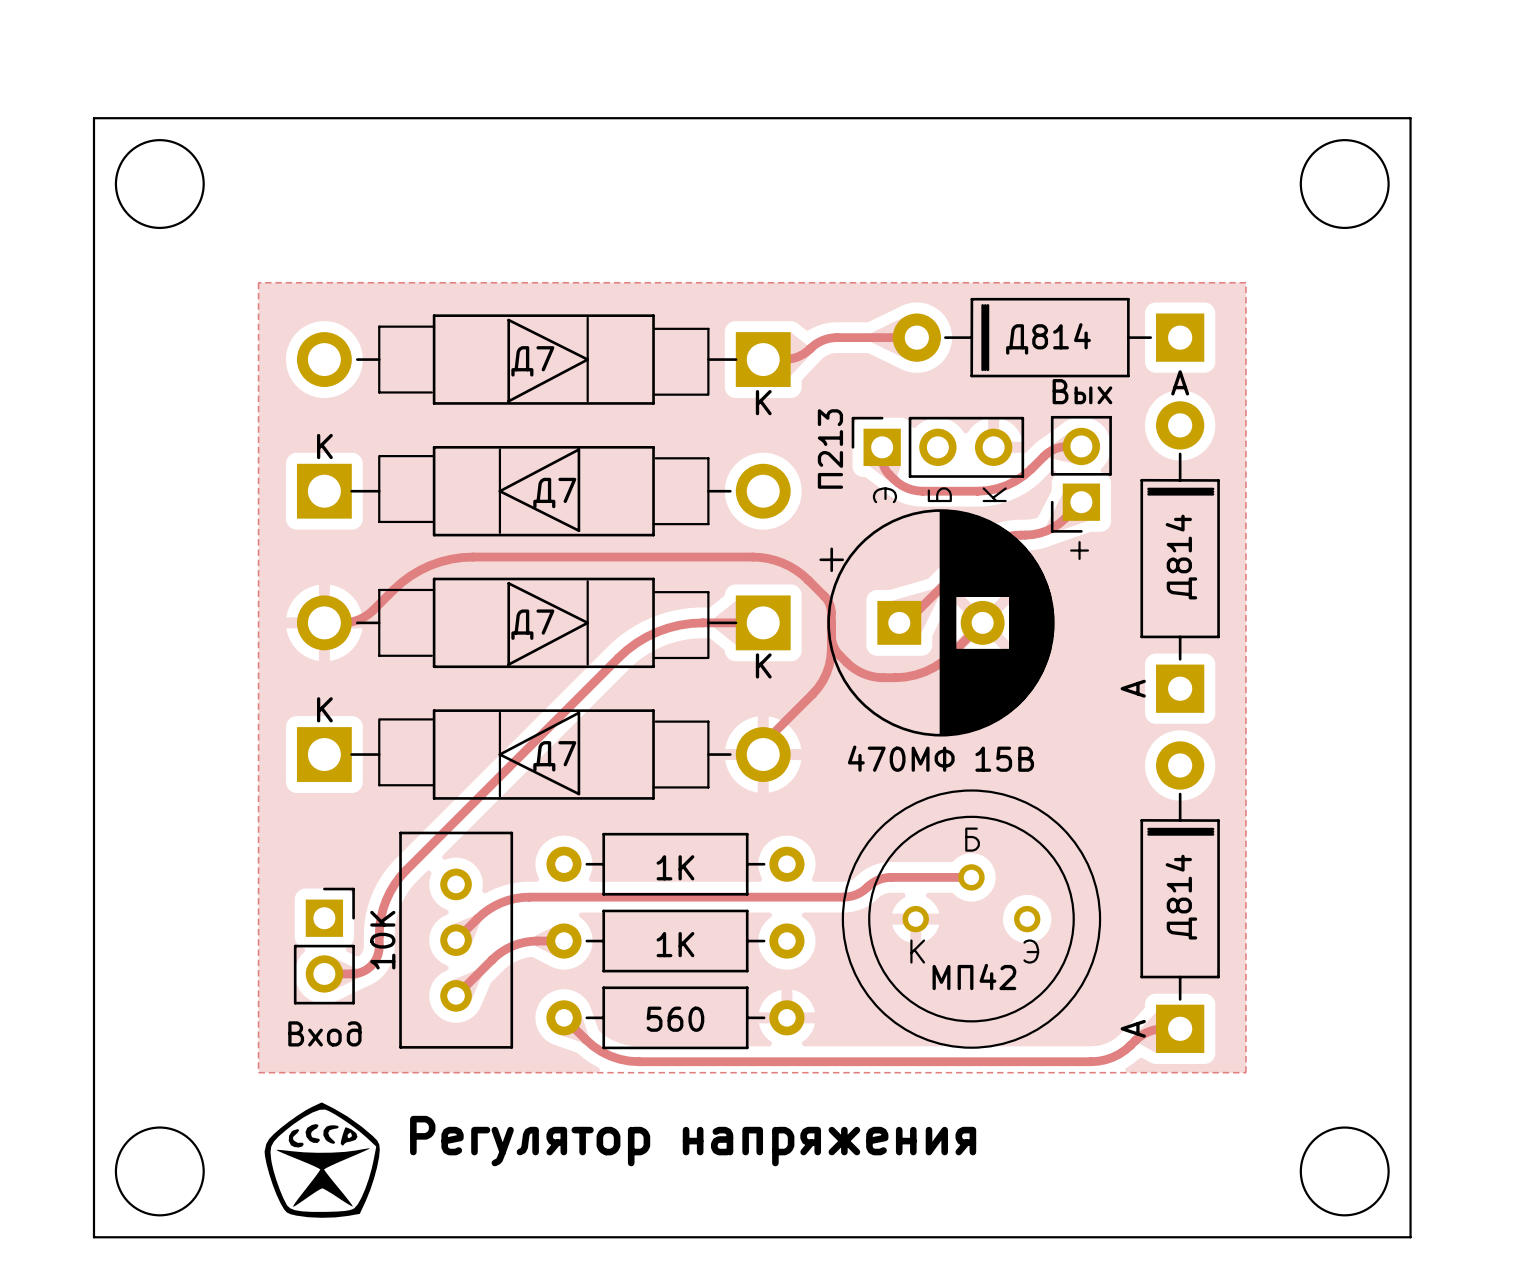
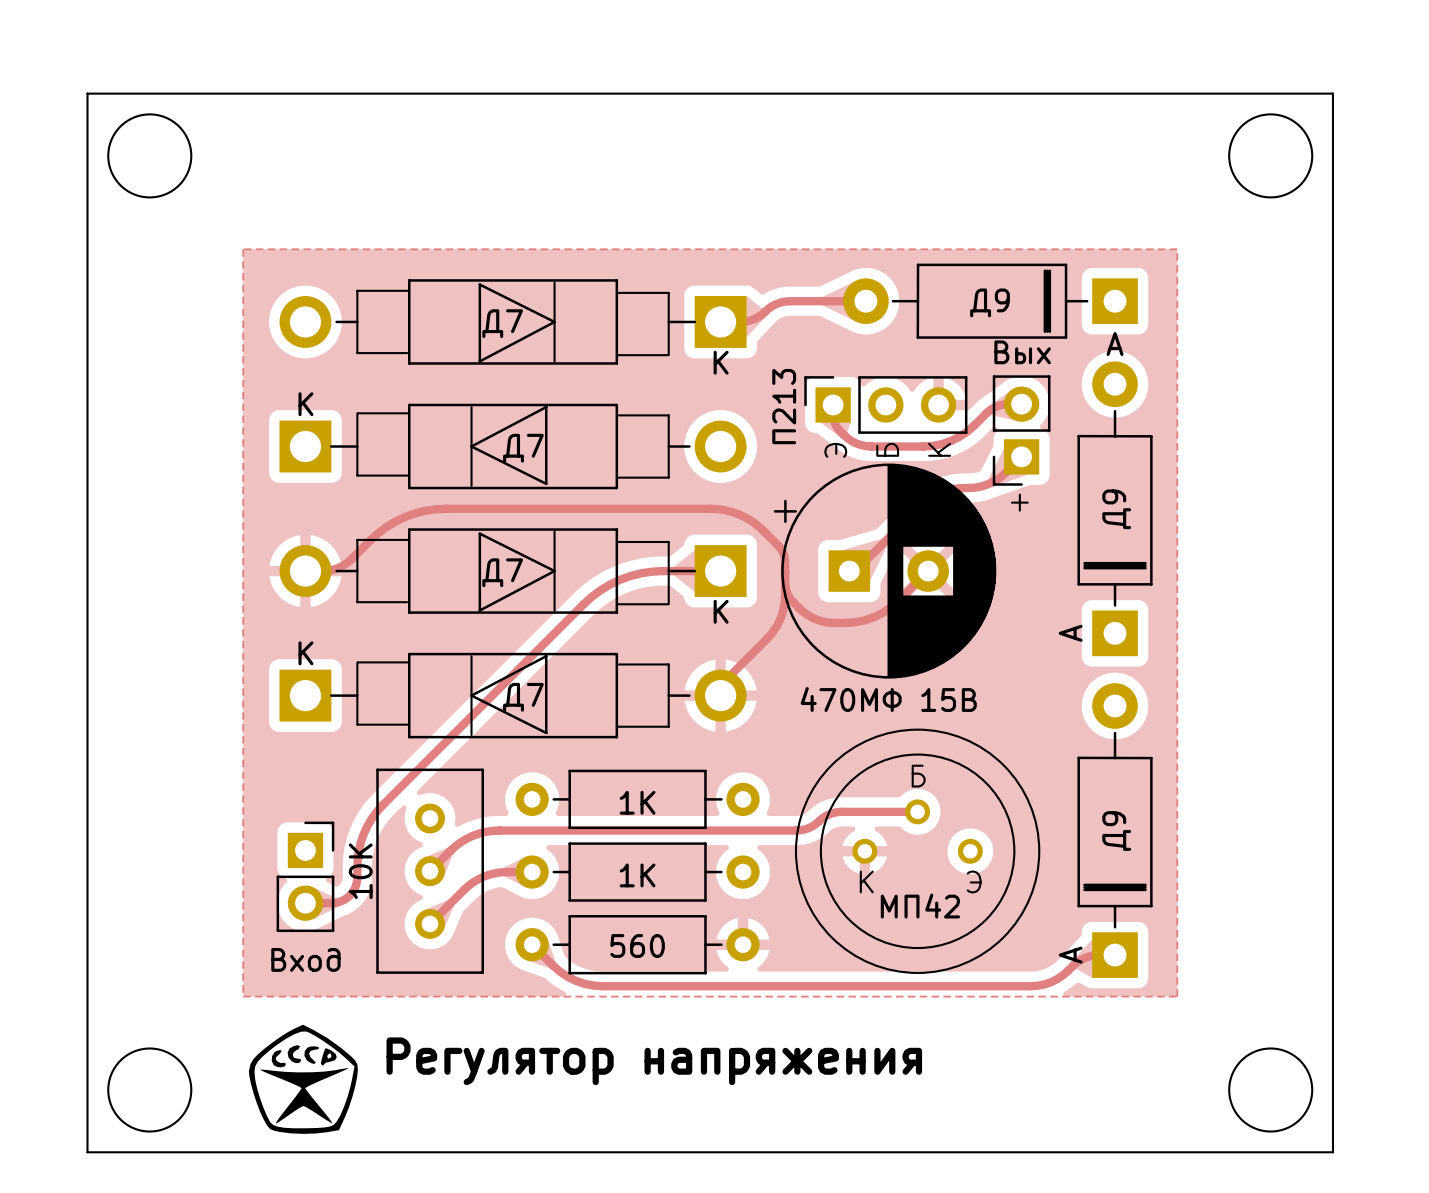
Д814: (1048, 337) -> none
Д9: none -> (990, 301)
Д814: (1180, 557) -> none
Д9: none -> (1115, 508)
Д814: (1180, 897) -> none
Д9: none -> (1115, 830)

